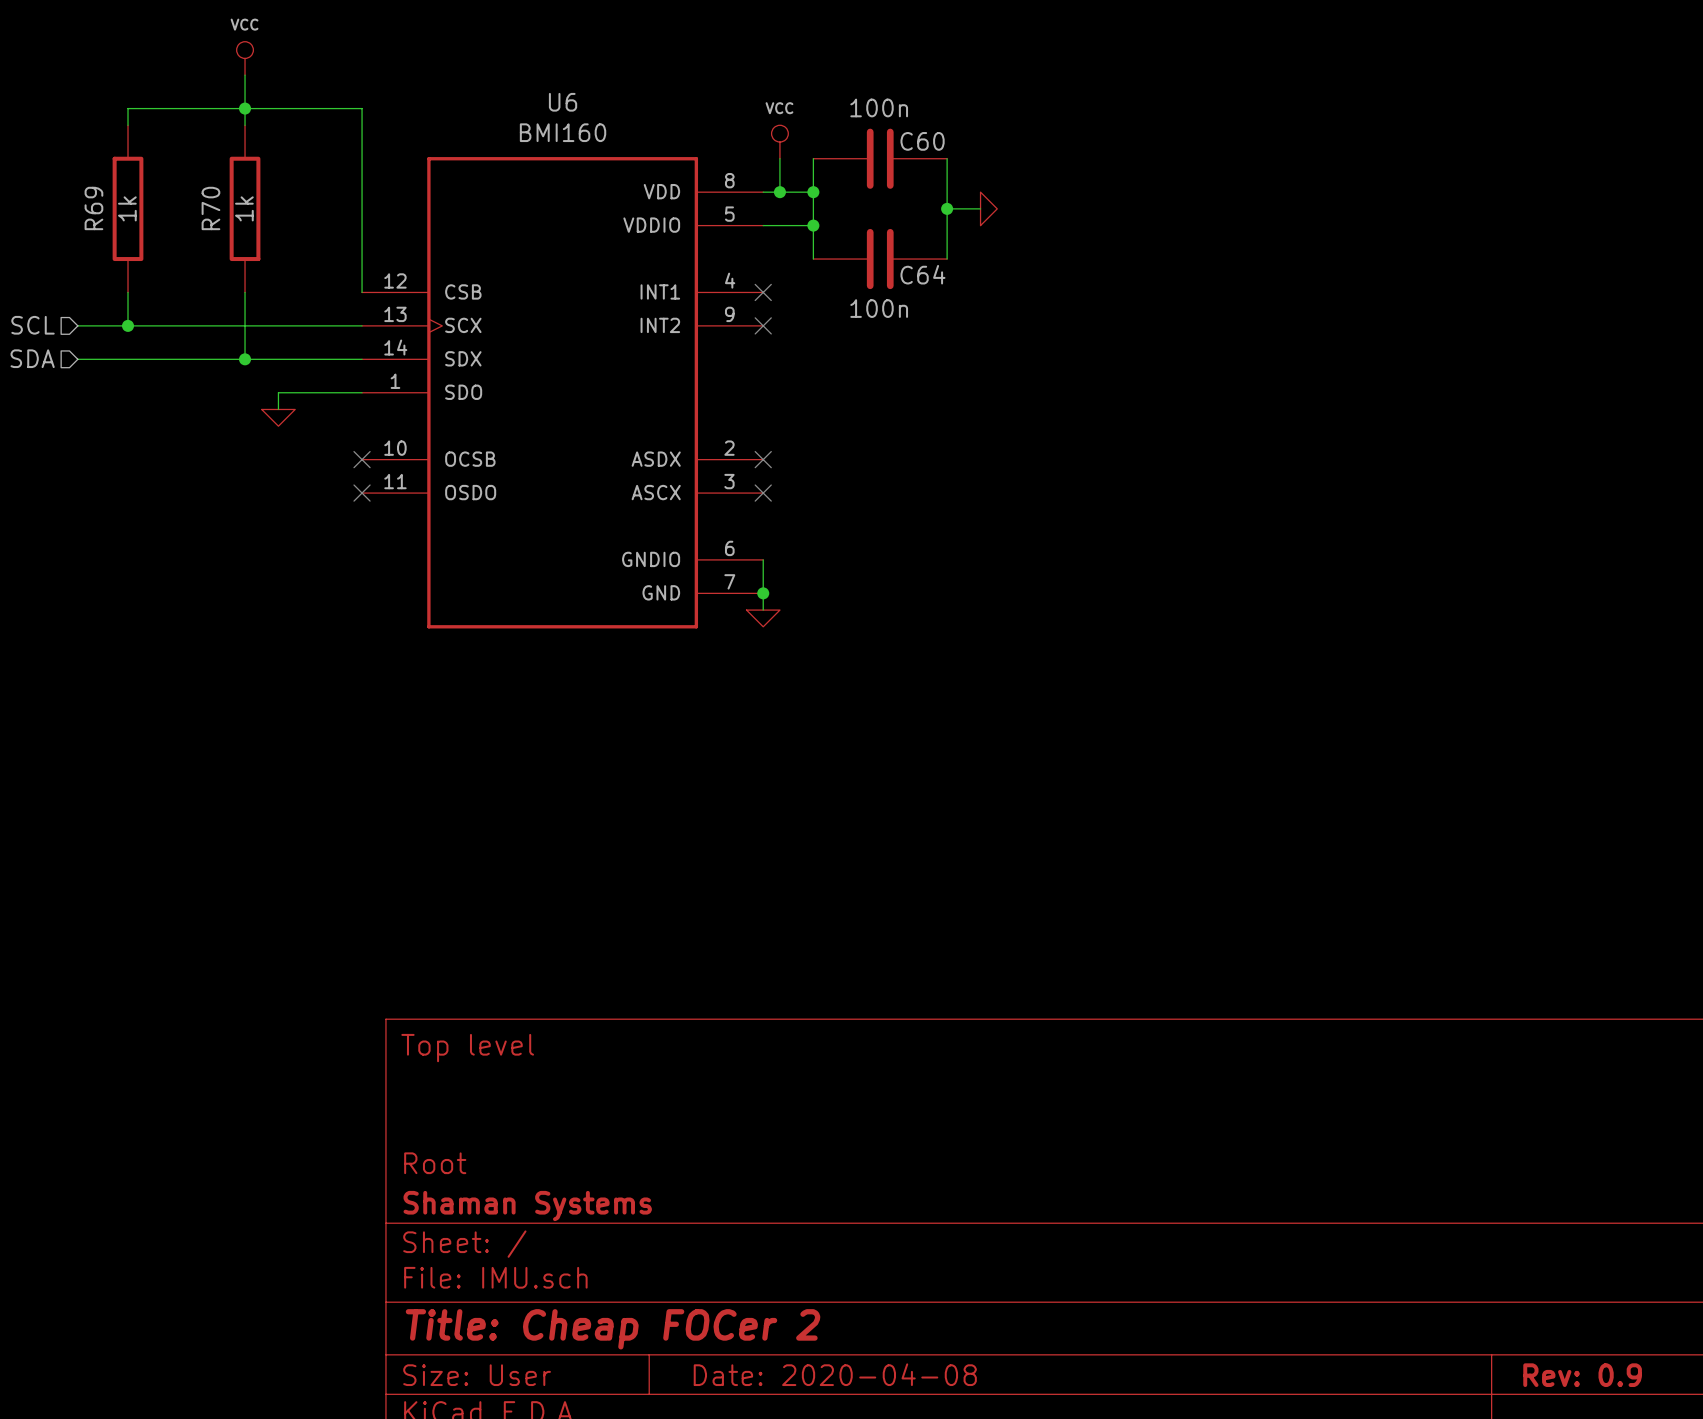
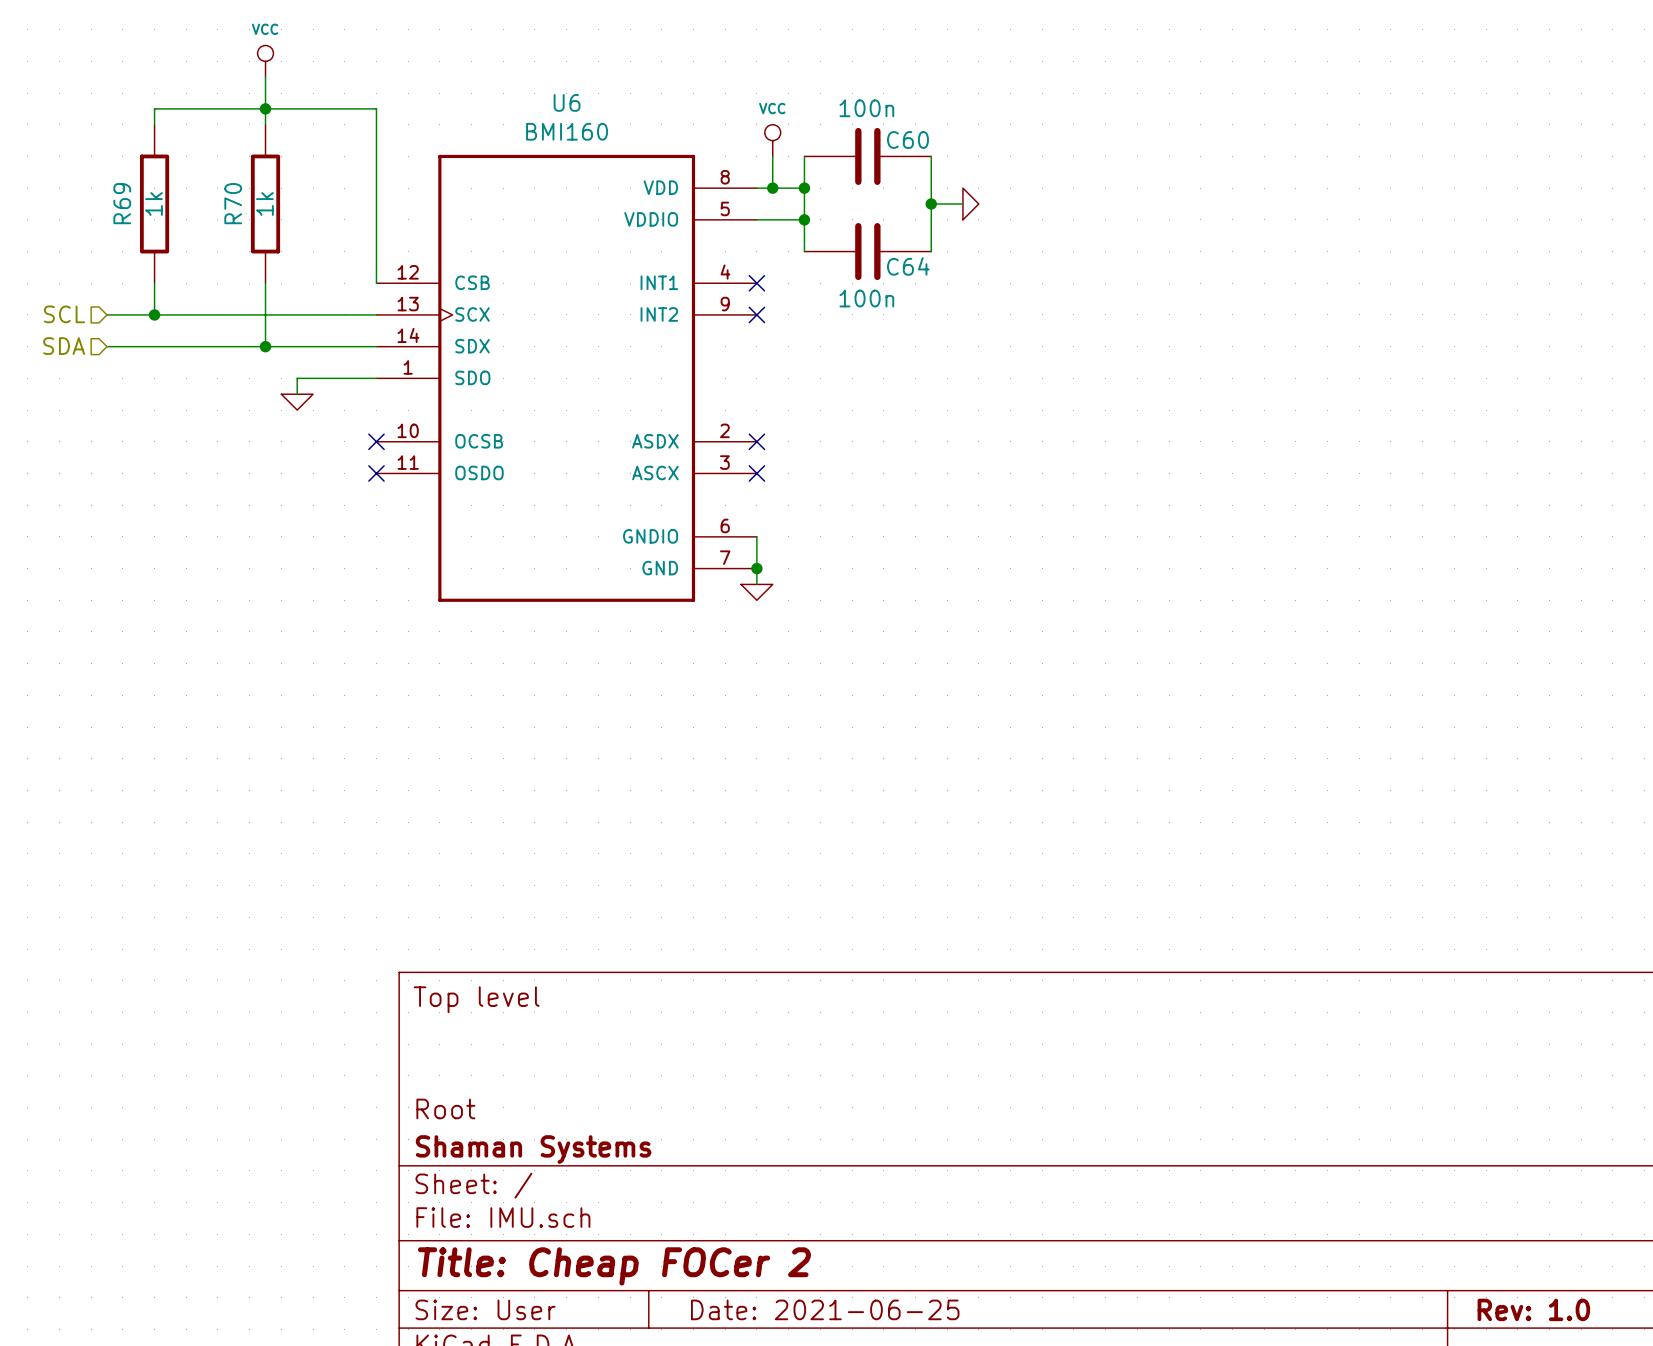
title block: Date: 2020-04-08 (835, 1374) -> Date: 2021-06-25 (825, 1309)
title block: Rev: 0.9 (1582, 1375) -> Rev: 1.0 (1533, 1309)

